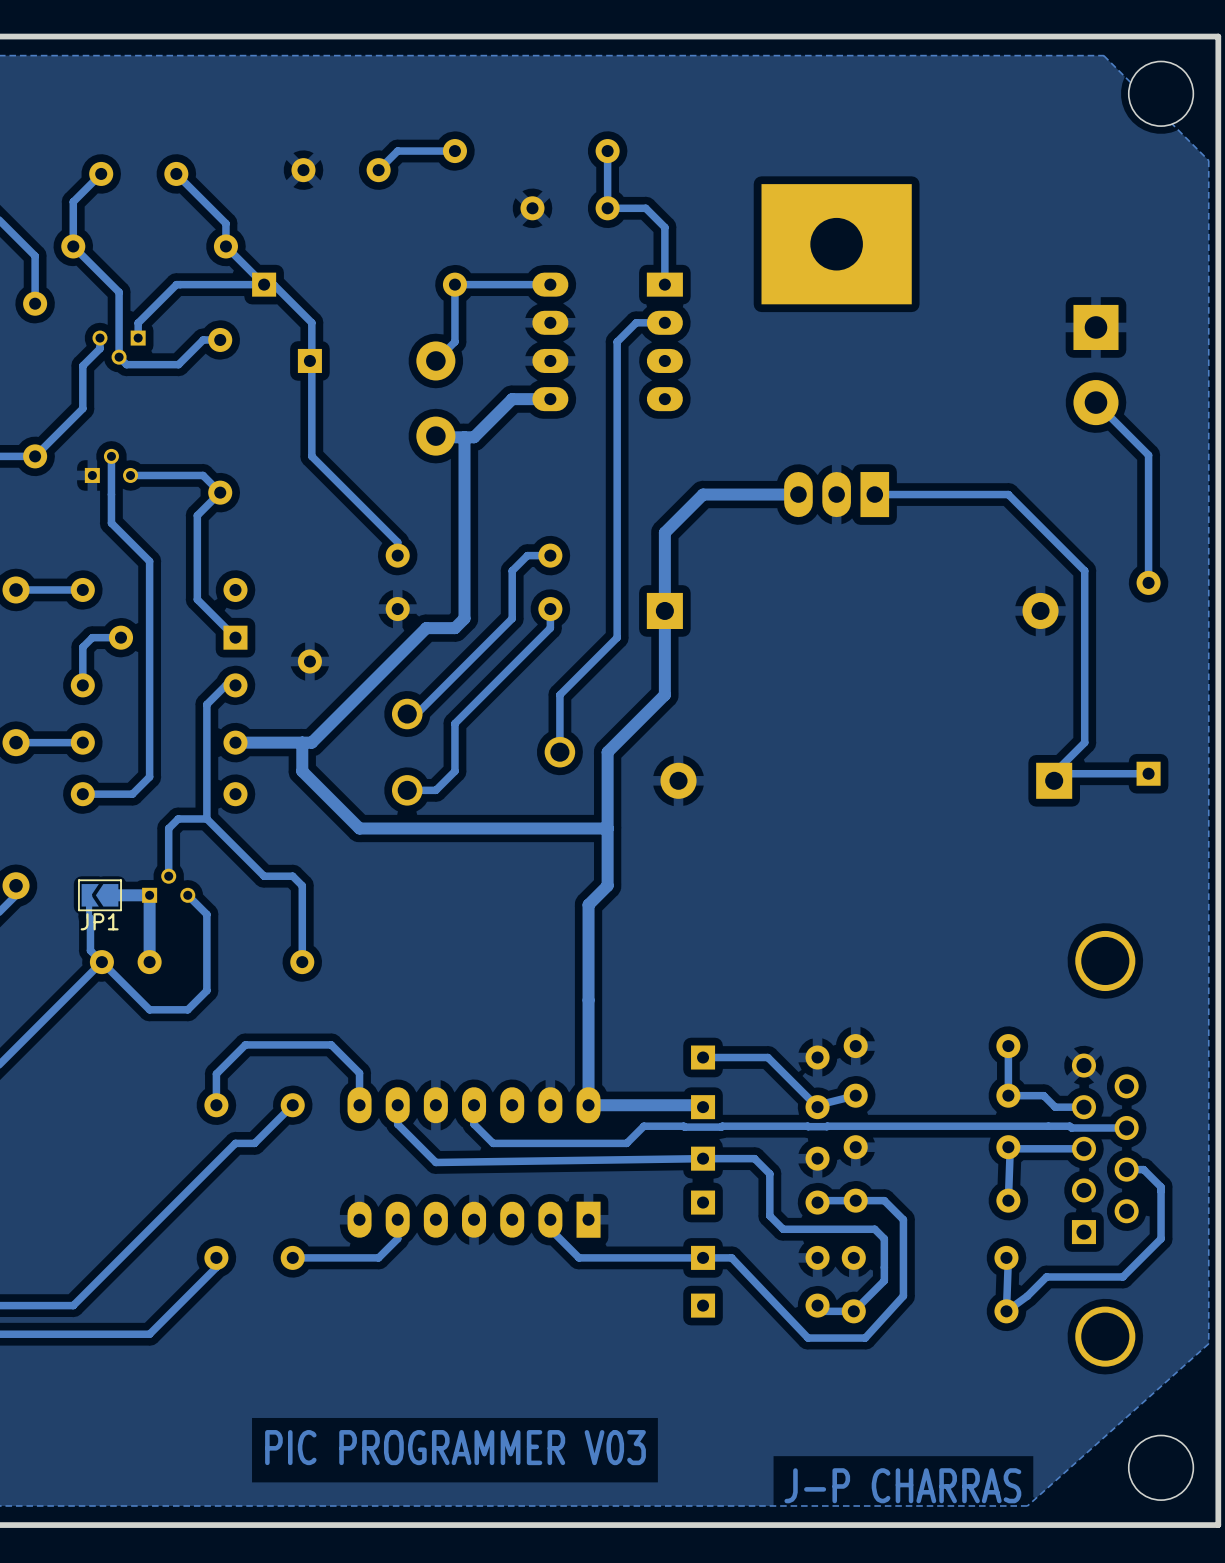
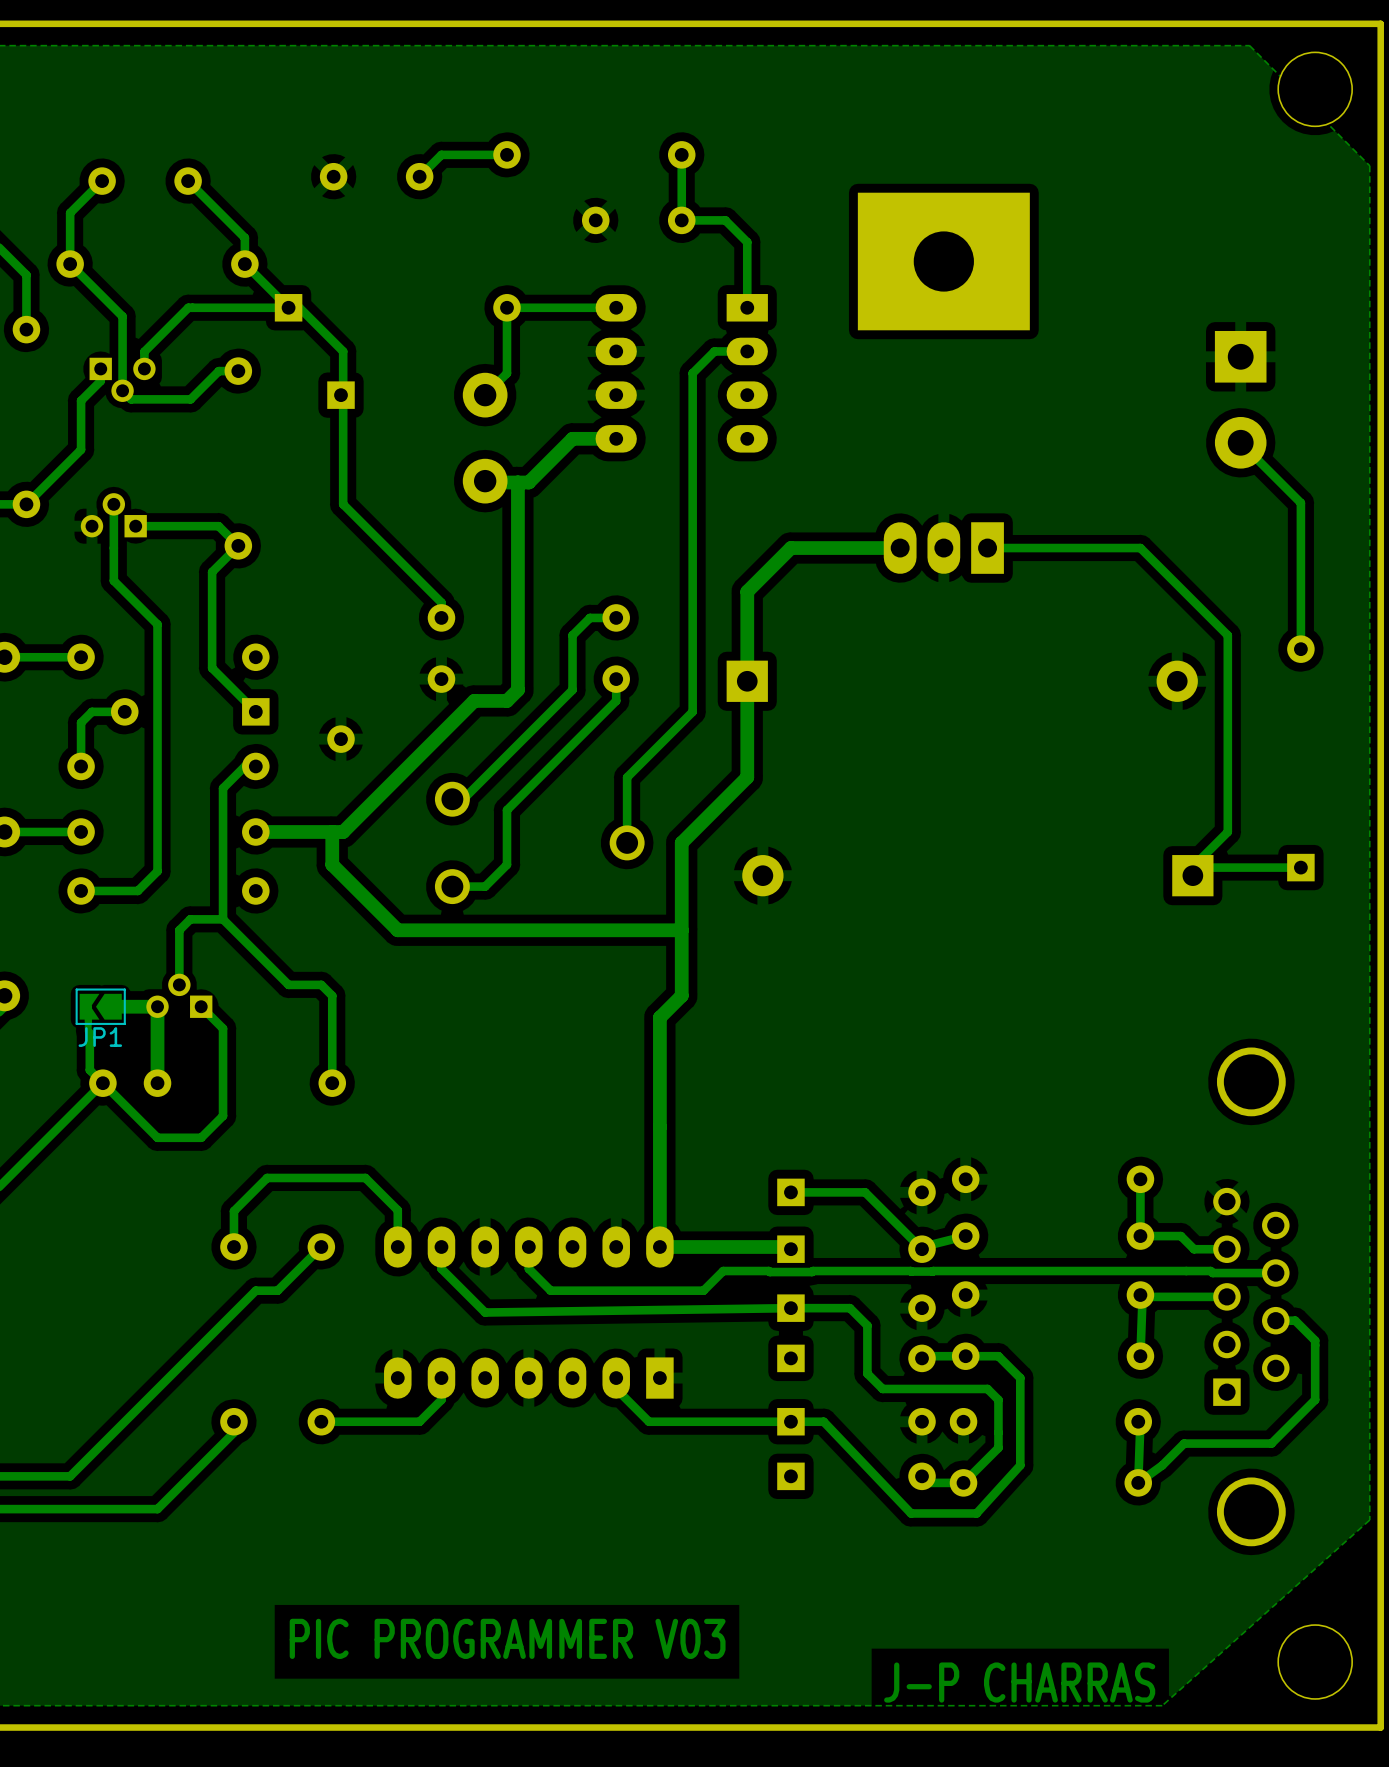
part footprint: [92, 330, 146, 365] -> [89, 357, 156, 402]
part footprint: [84, 448, 139, 483] -> [80, 493, 147, 538]
part footprint: [142, 868, 196, 903] -> [146, 973, 213, 1018]

